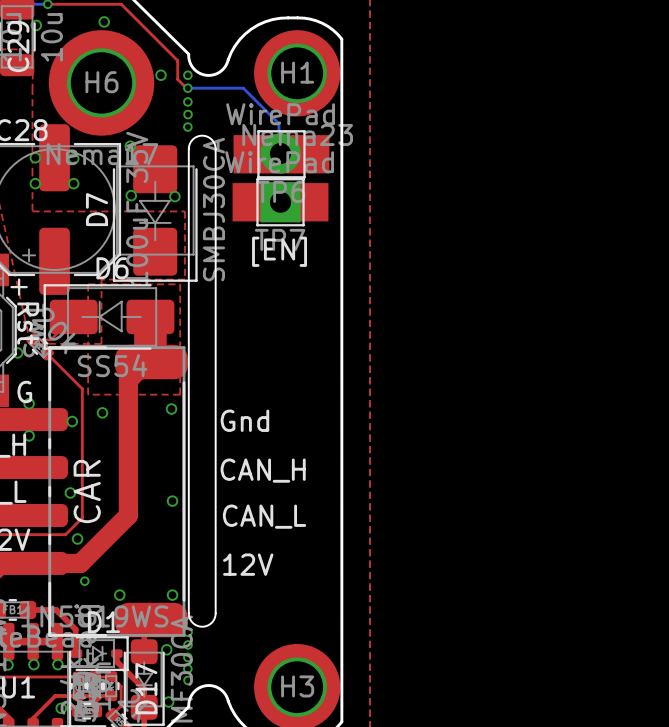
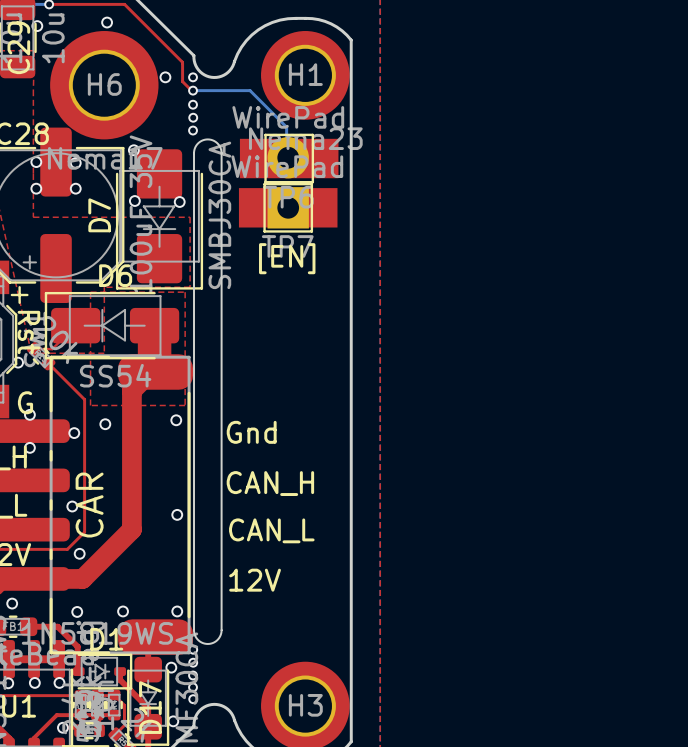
via: (84, 581) -> none
via: none -> (12, 603)
via: none -> (77, 611)

